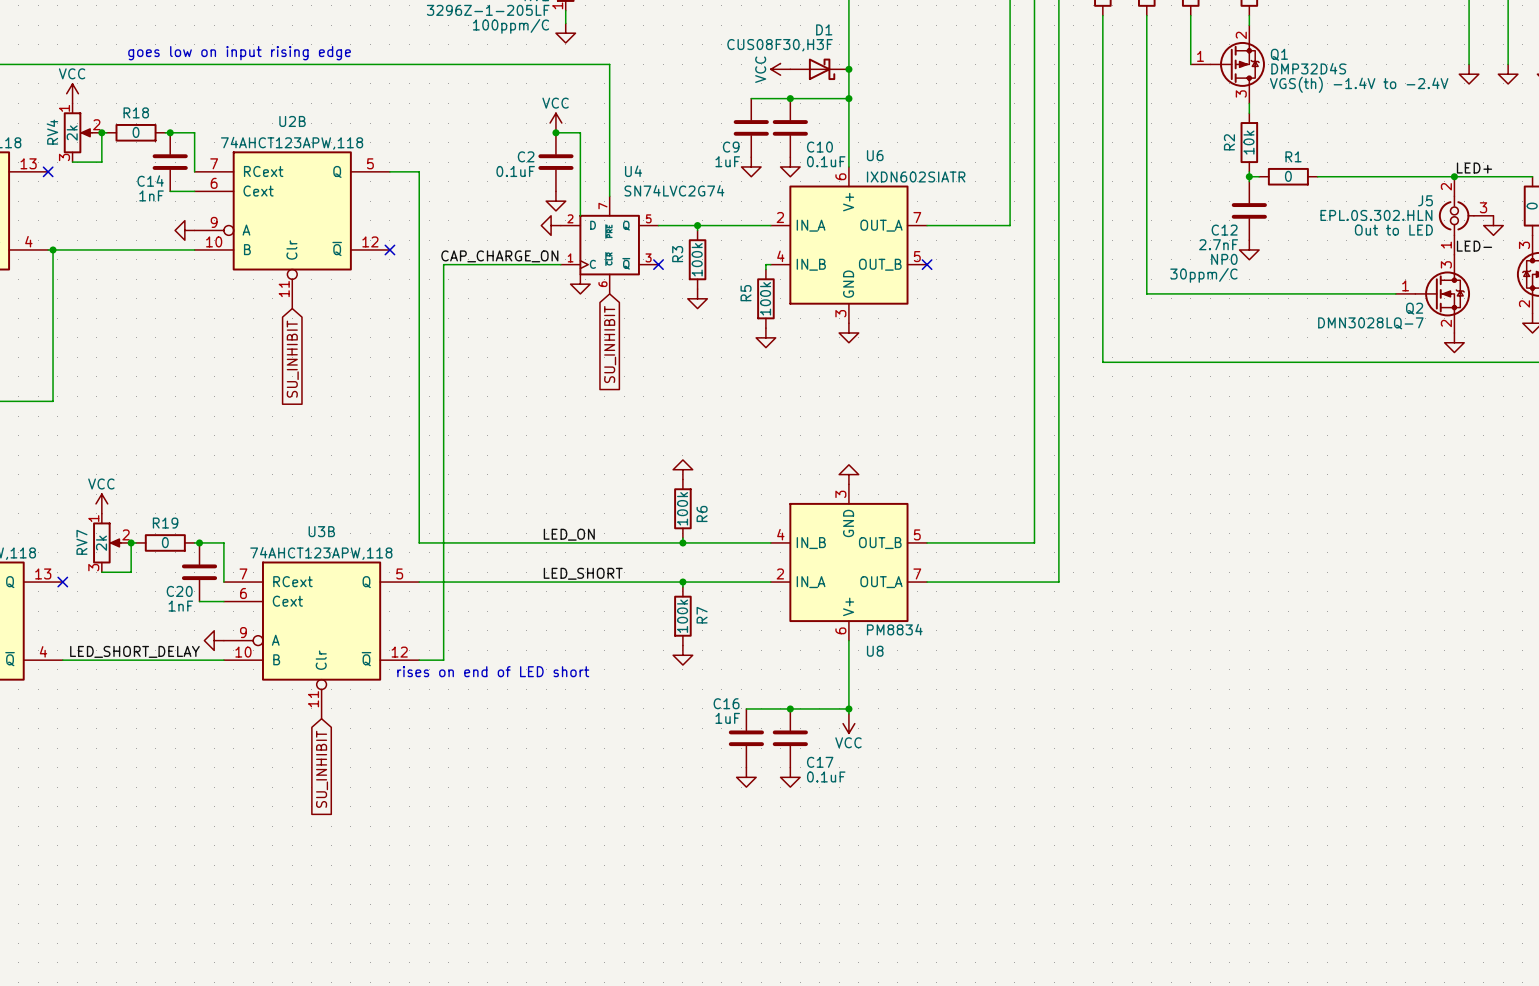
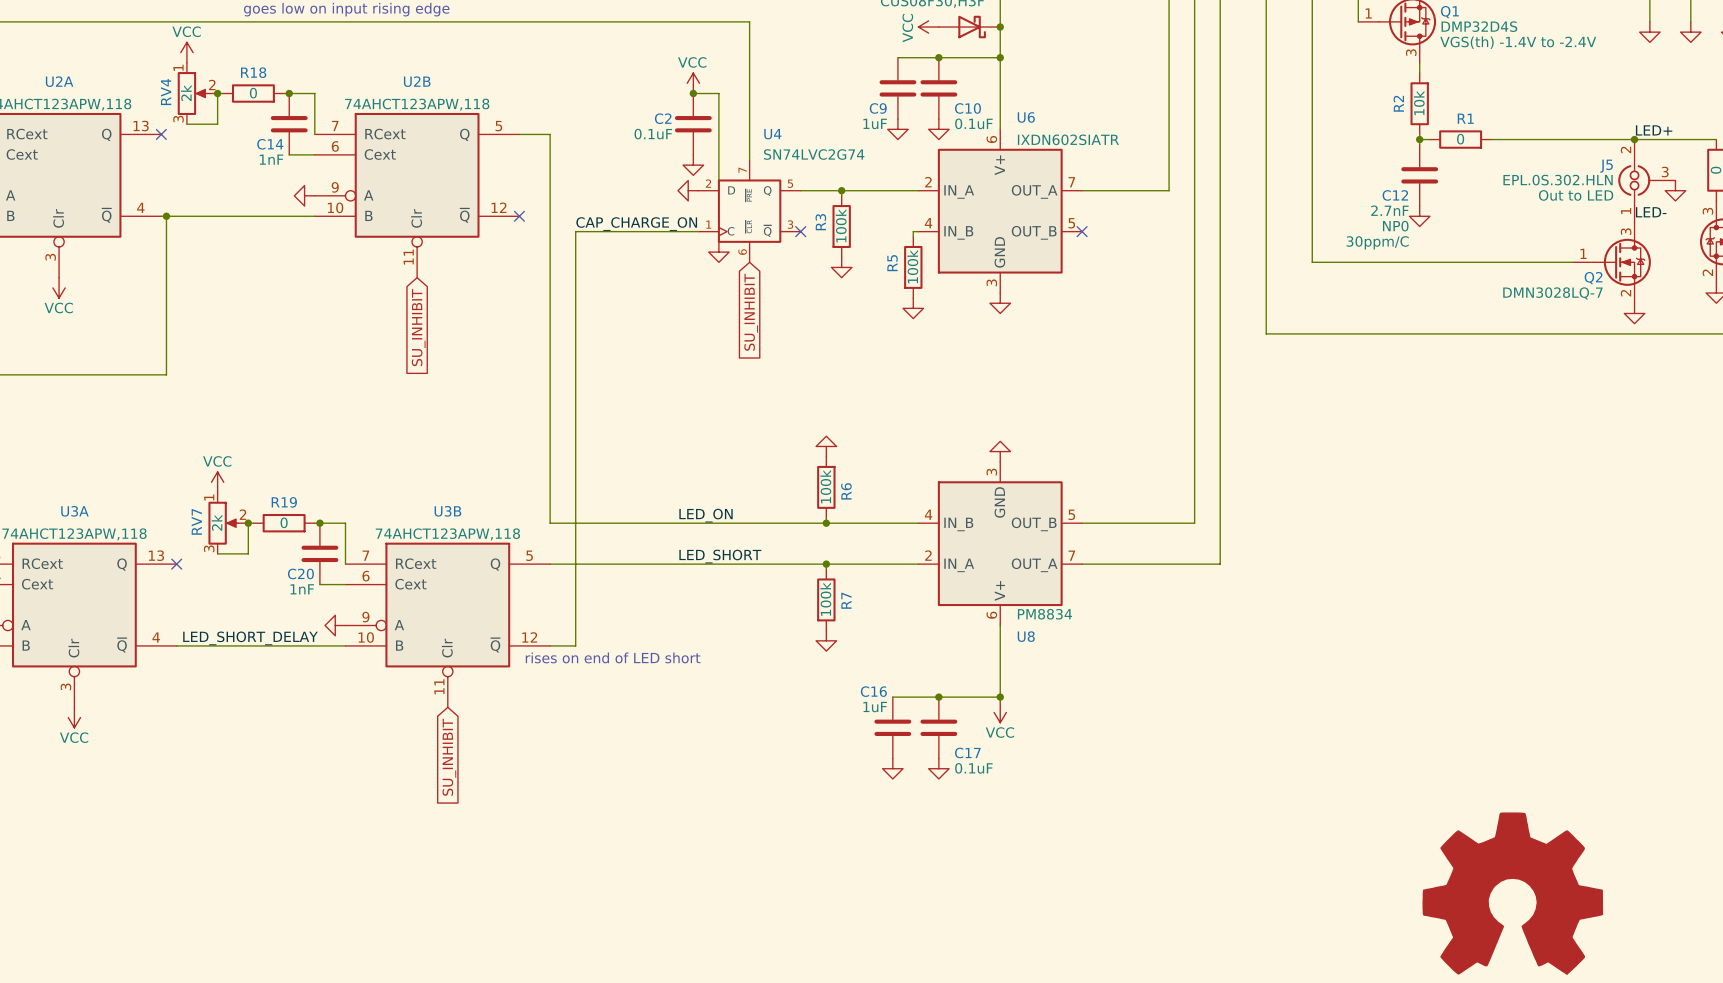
power symbol: none -> (1512, 893)

